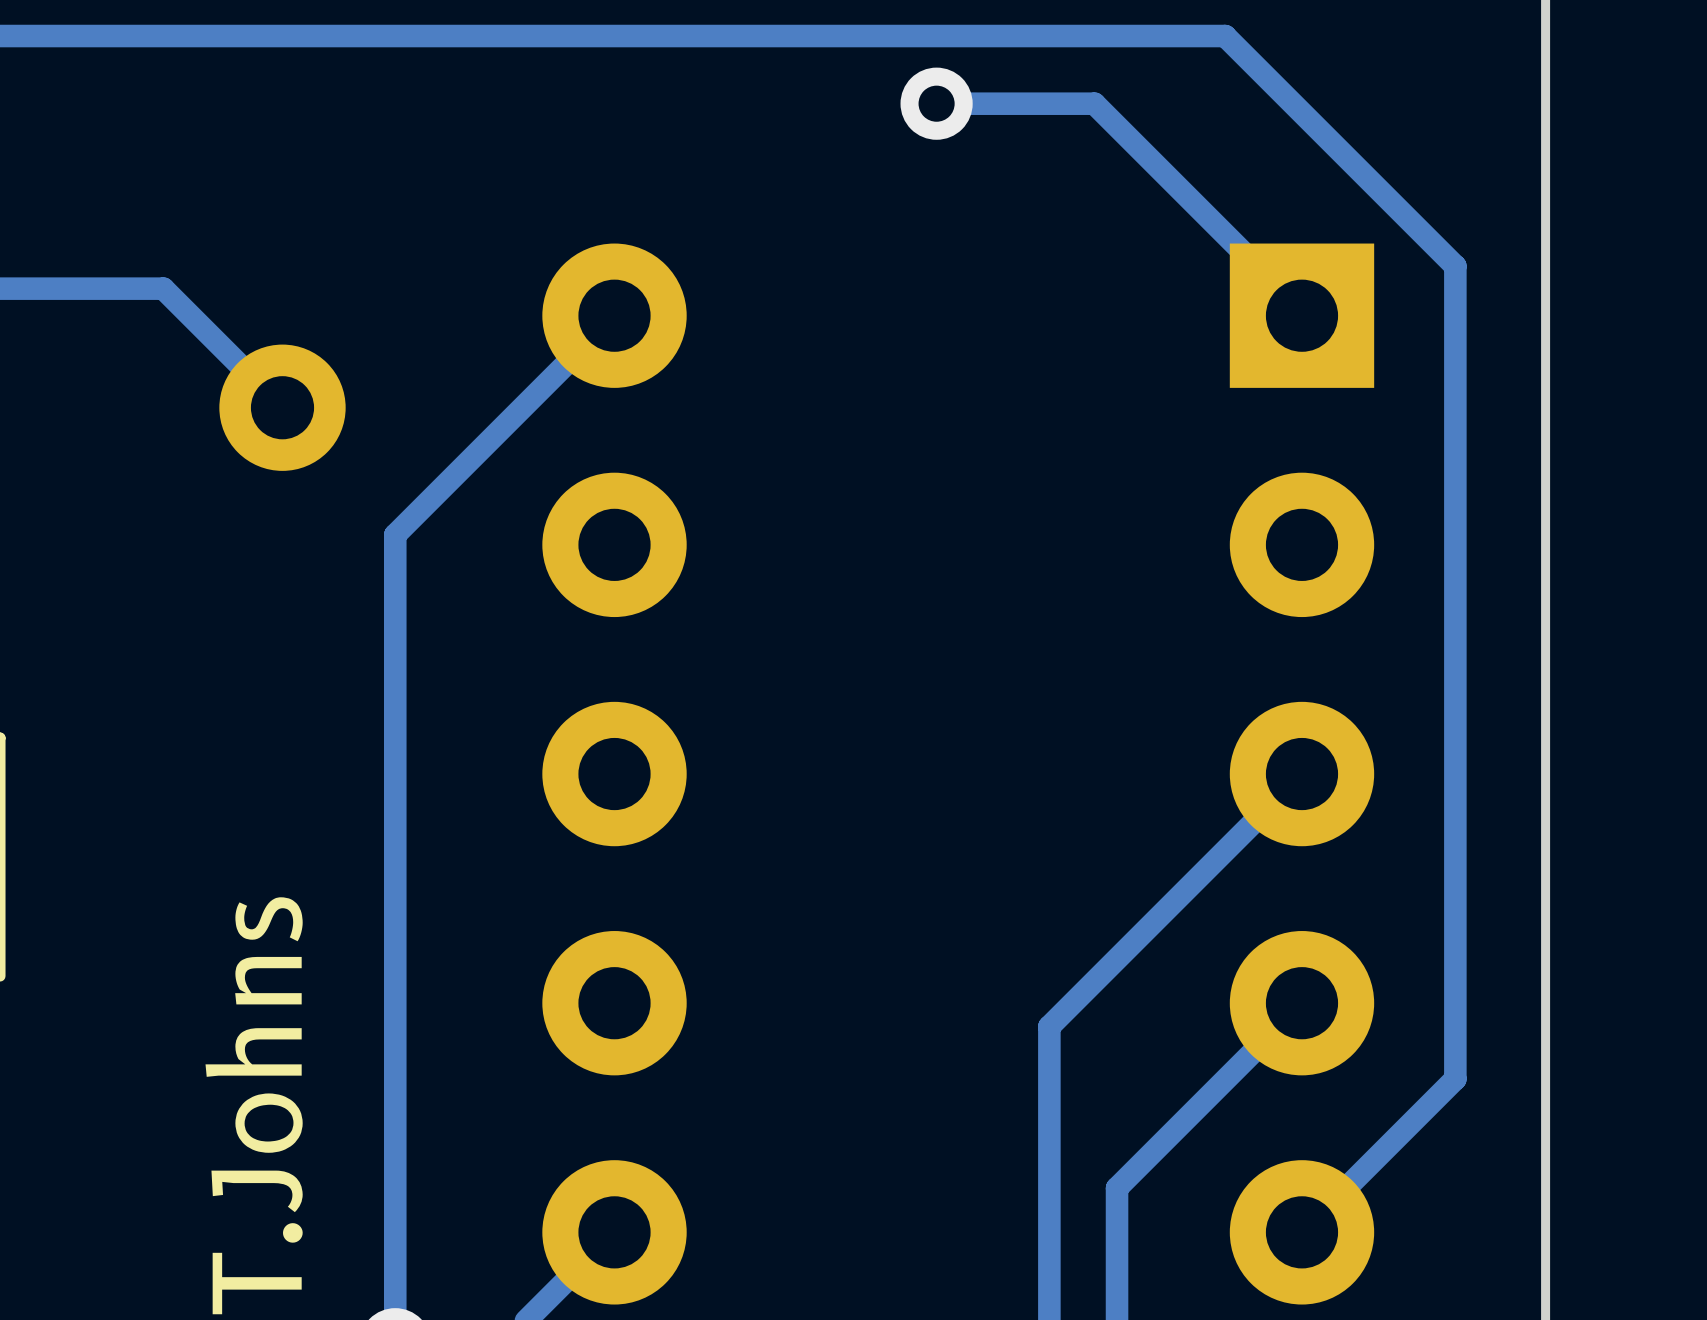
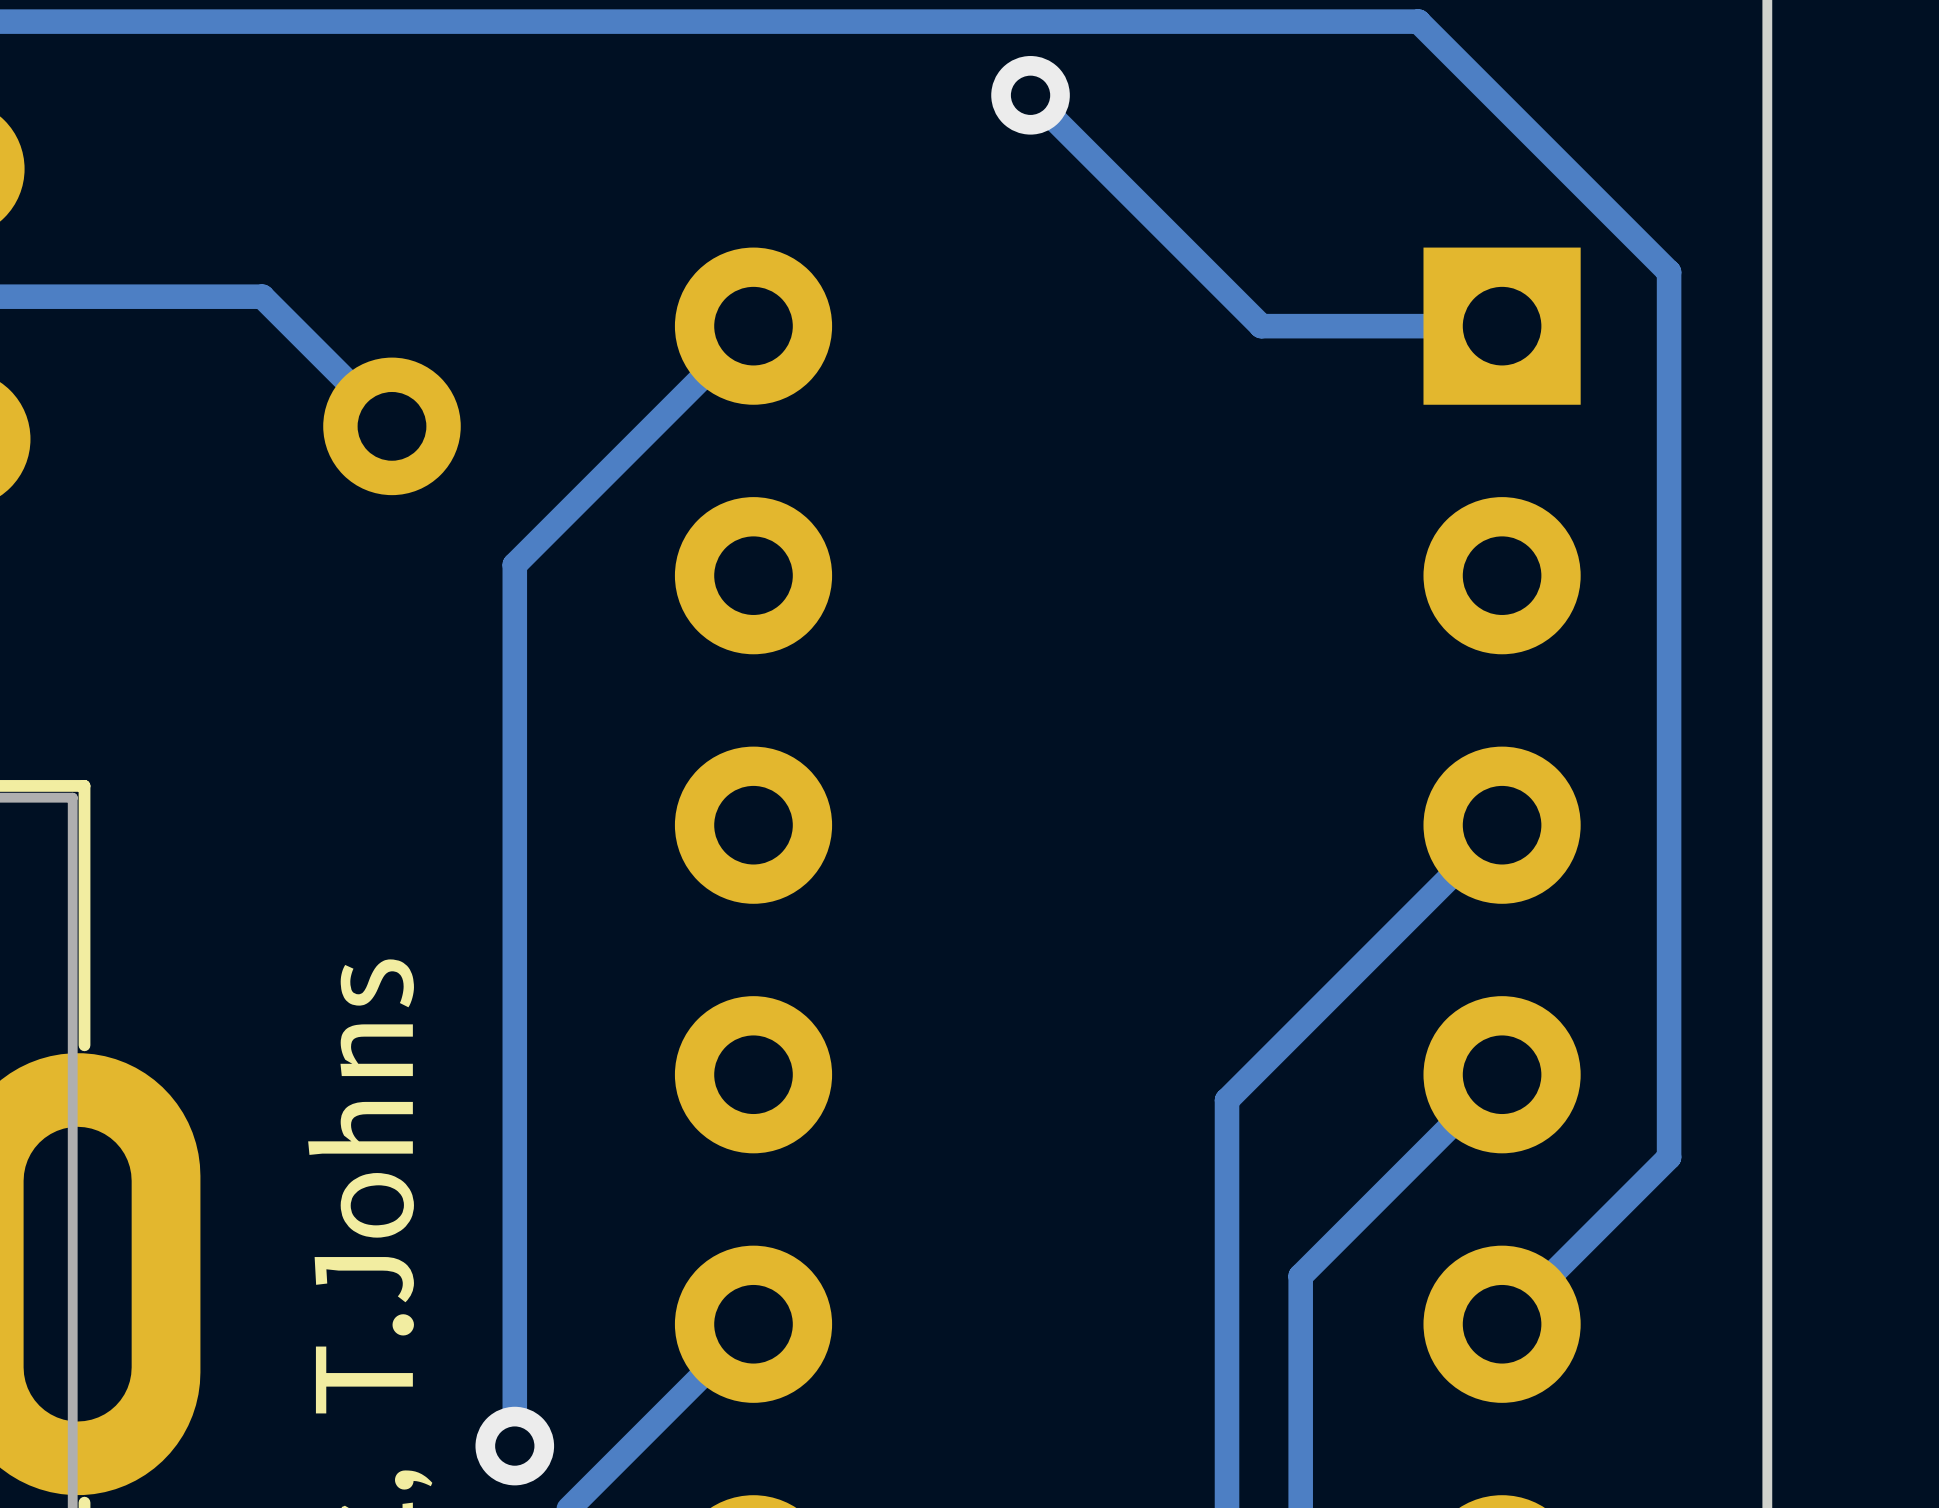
track: (936, 103) (1094, 103) (1301, 311) (1301, 315) -> (1030, 95) (1261, 326) (1502, 326)
via position: (936, 103) -> (1030, 95)

